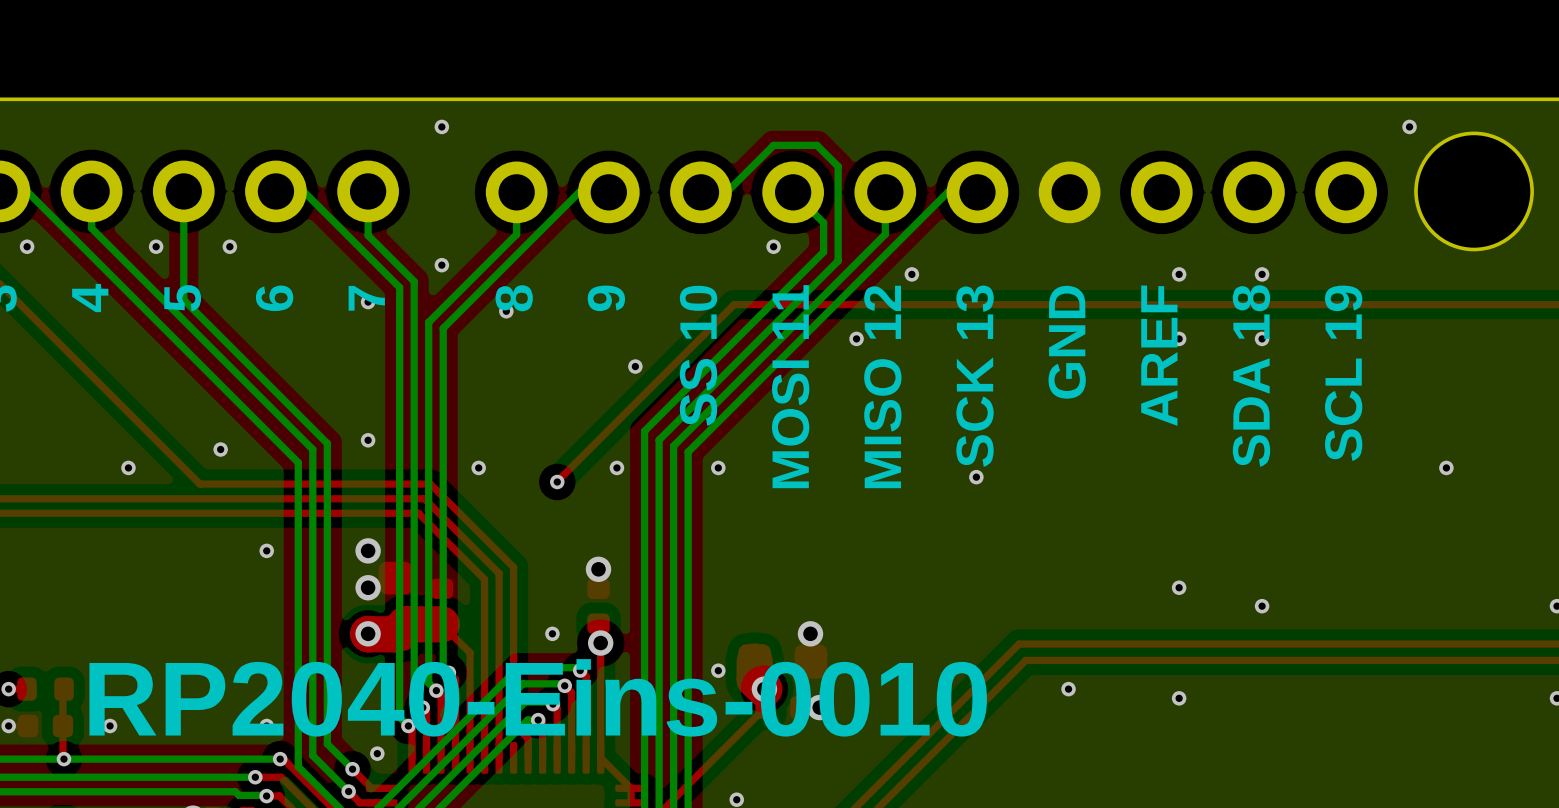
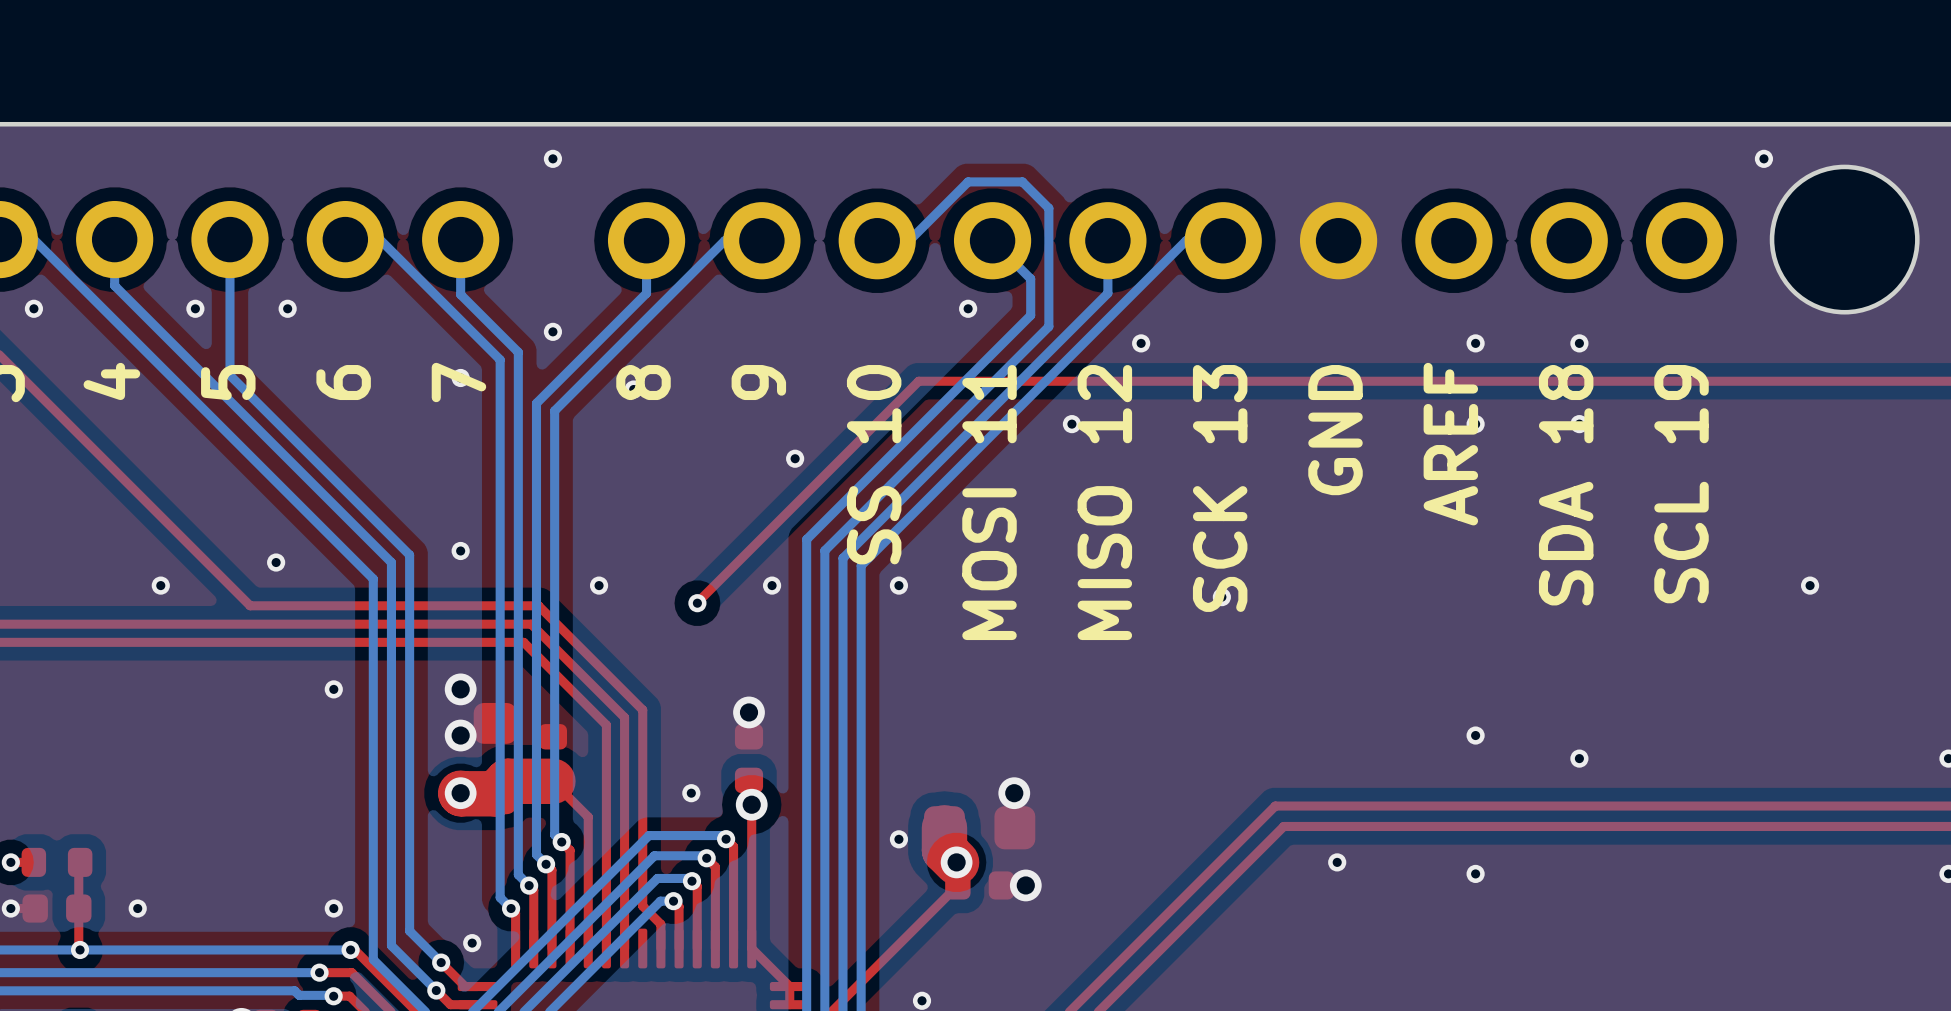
text: RP2040-Eins-0010 (538, 697) -> none

